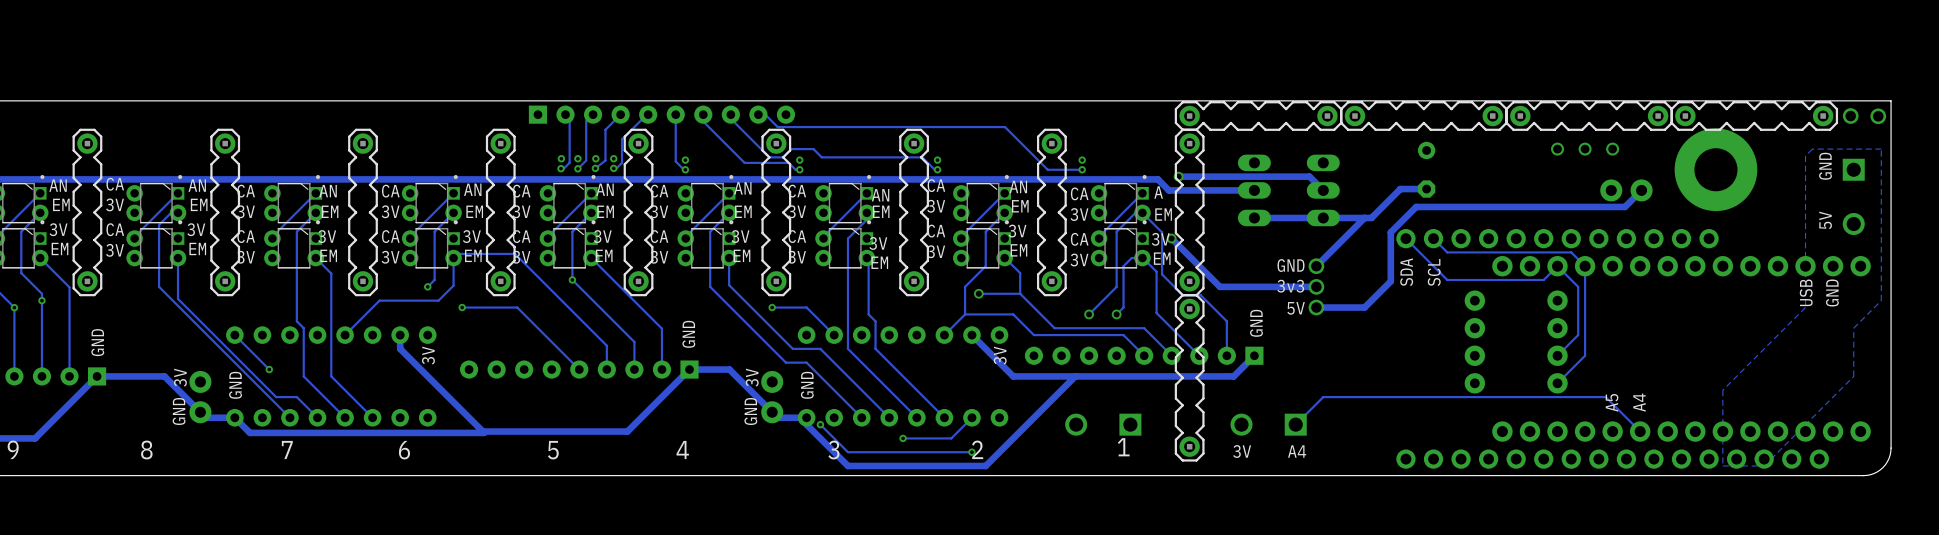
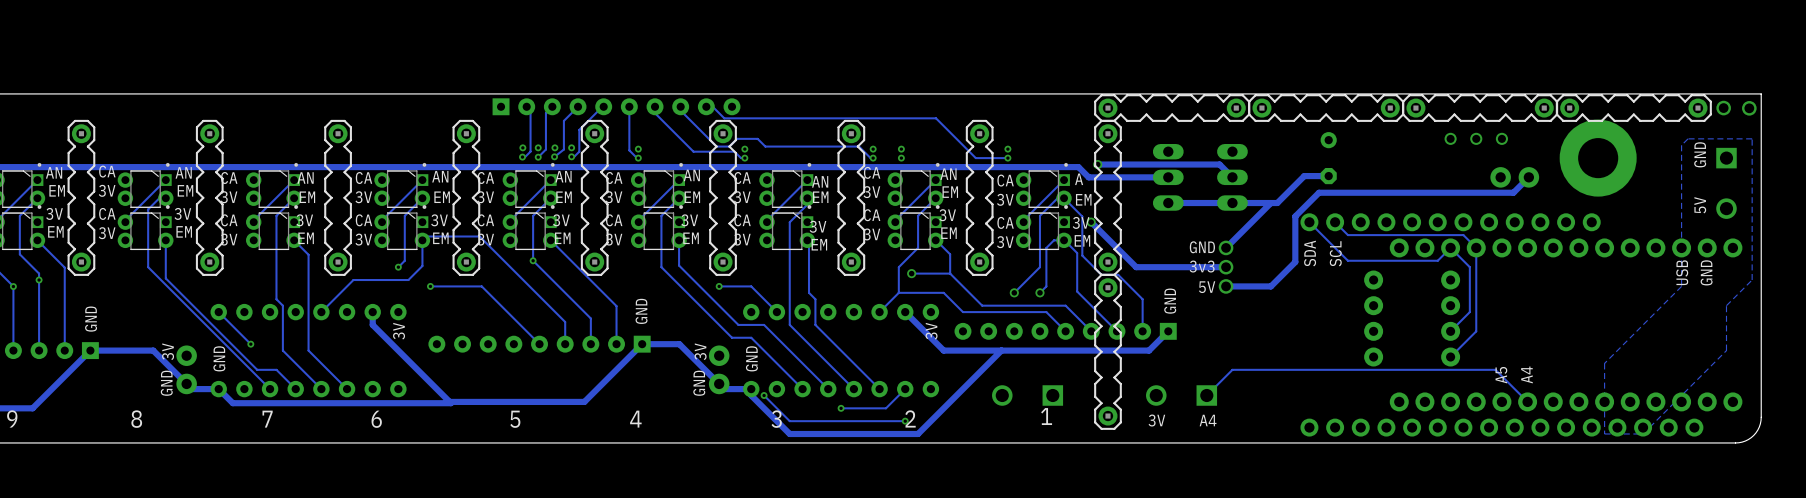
via: none -> (901, 149)
via: none -> (901, 158)

